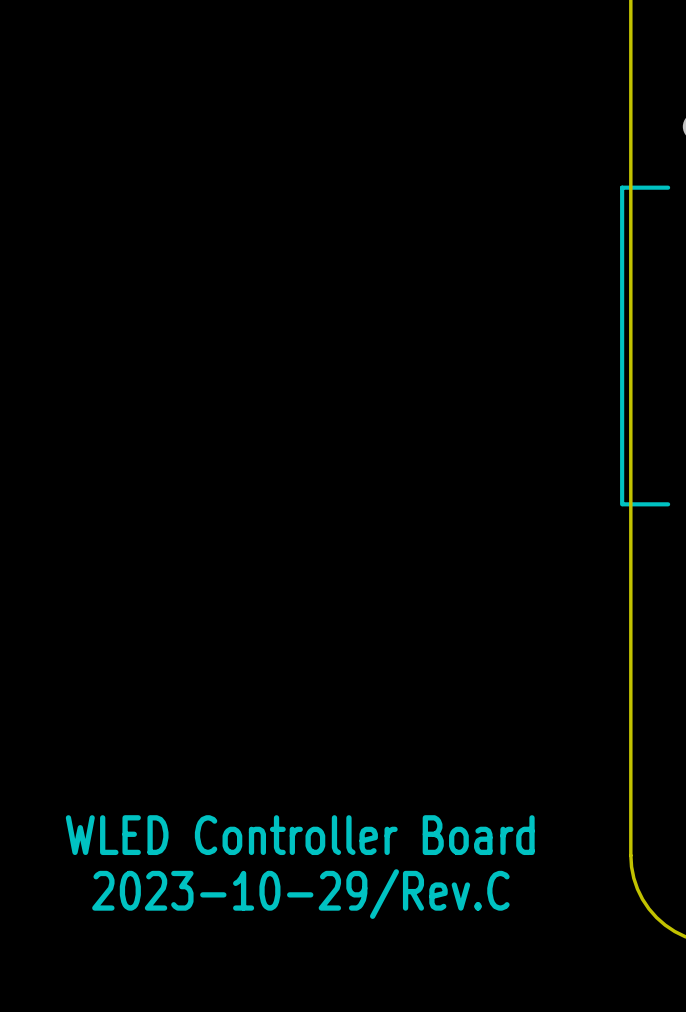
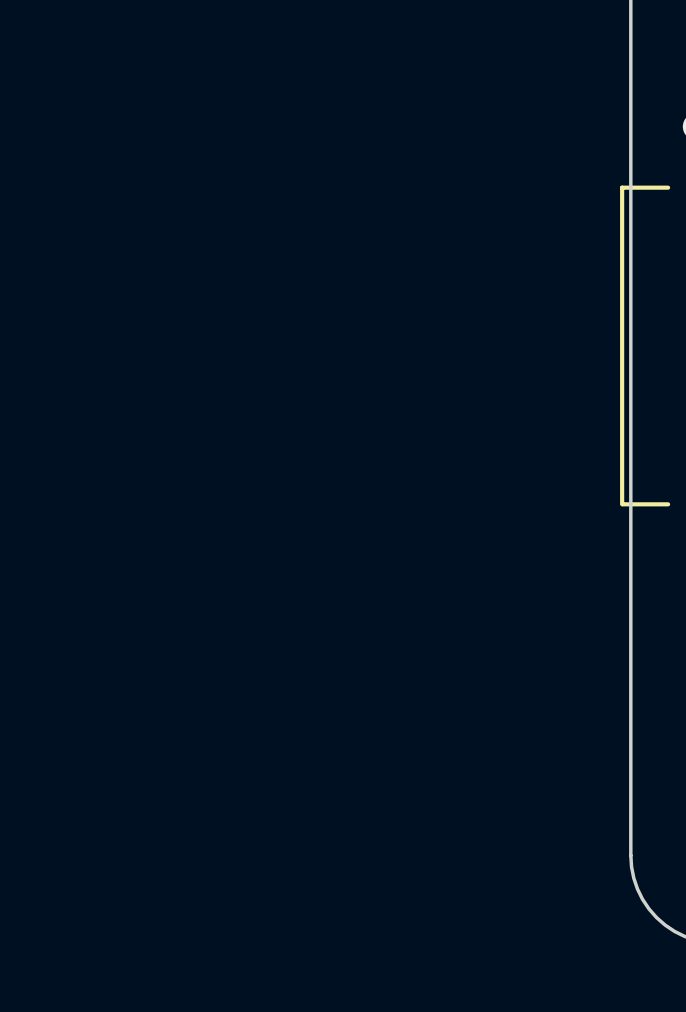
text: WLED Controller Board (300, 835) -> none
text: 2023-10-29/Rev.C (300, 894) -> none

